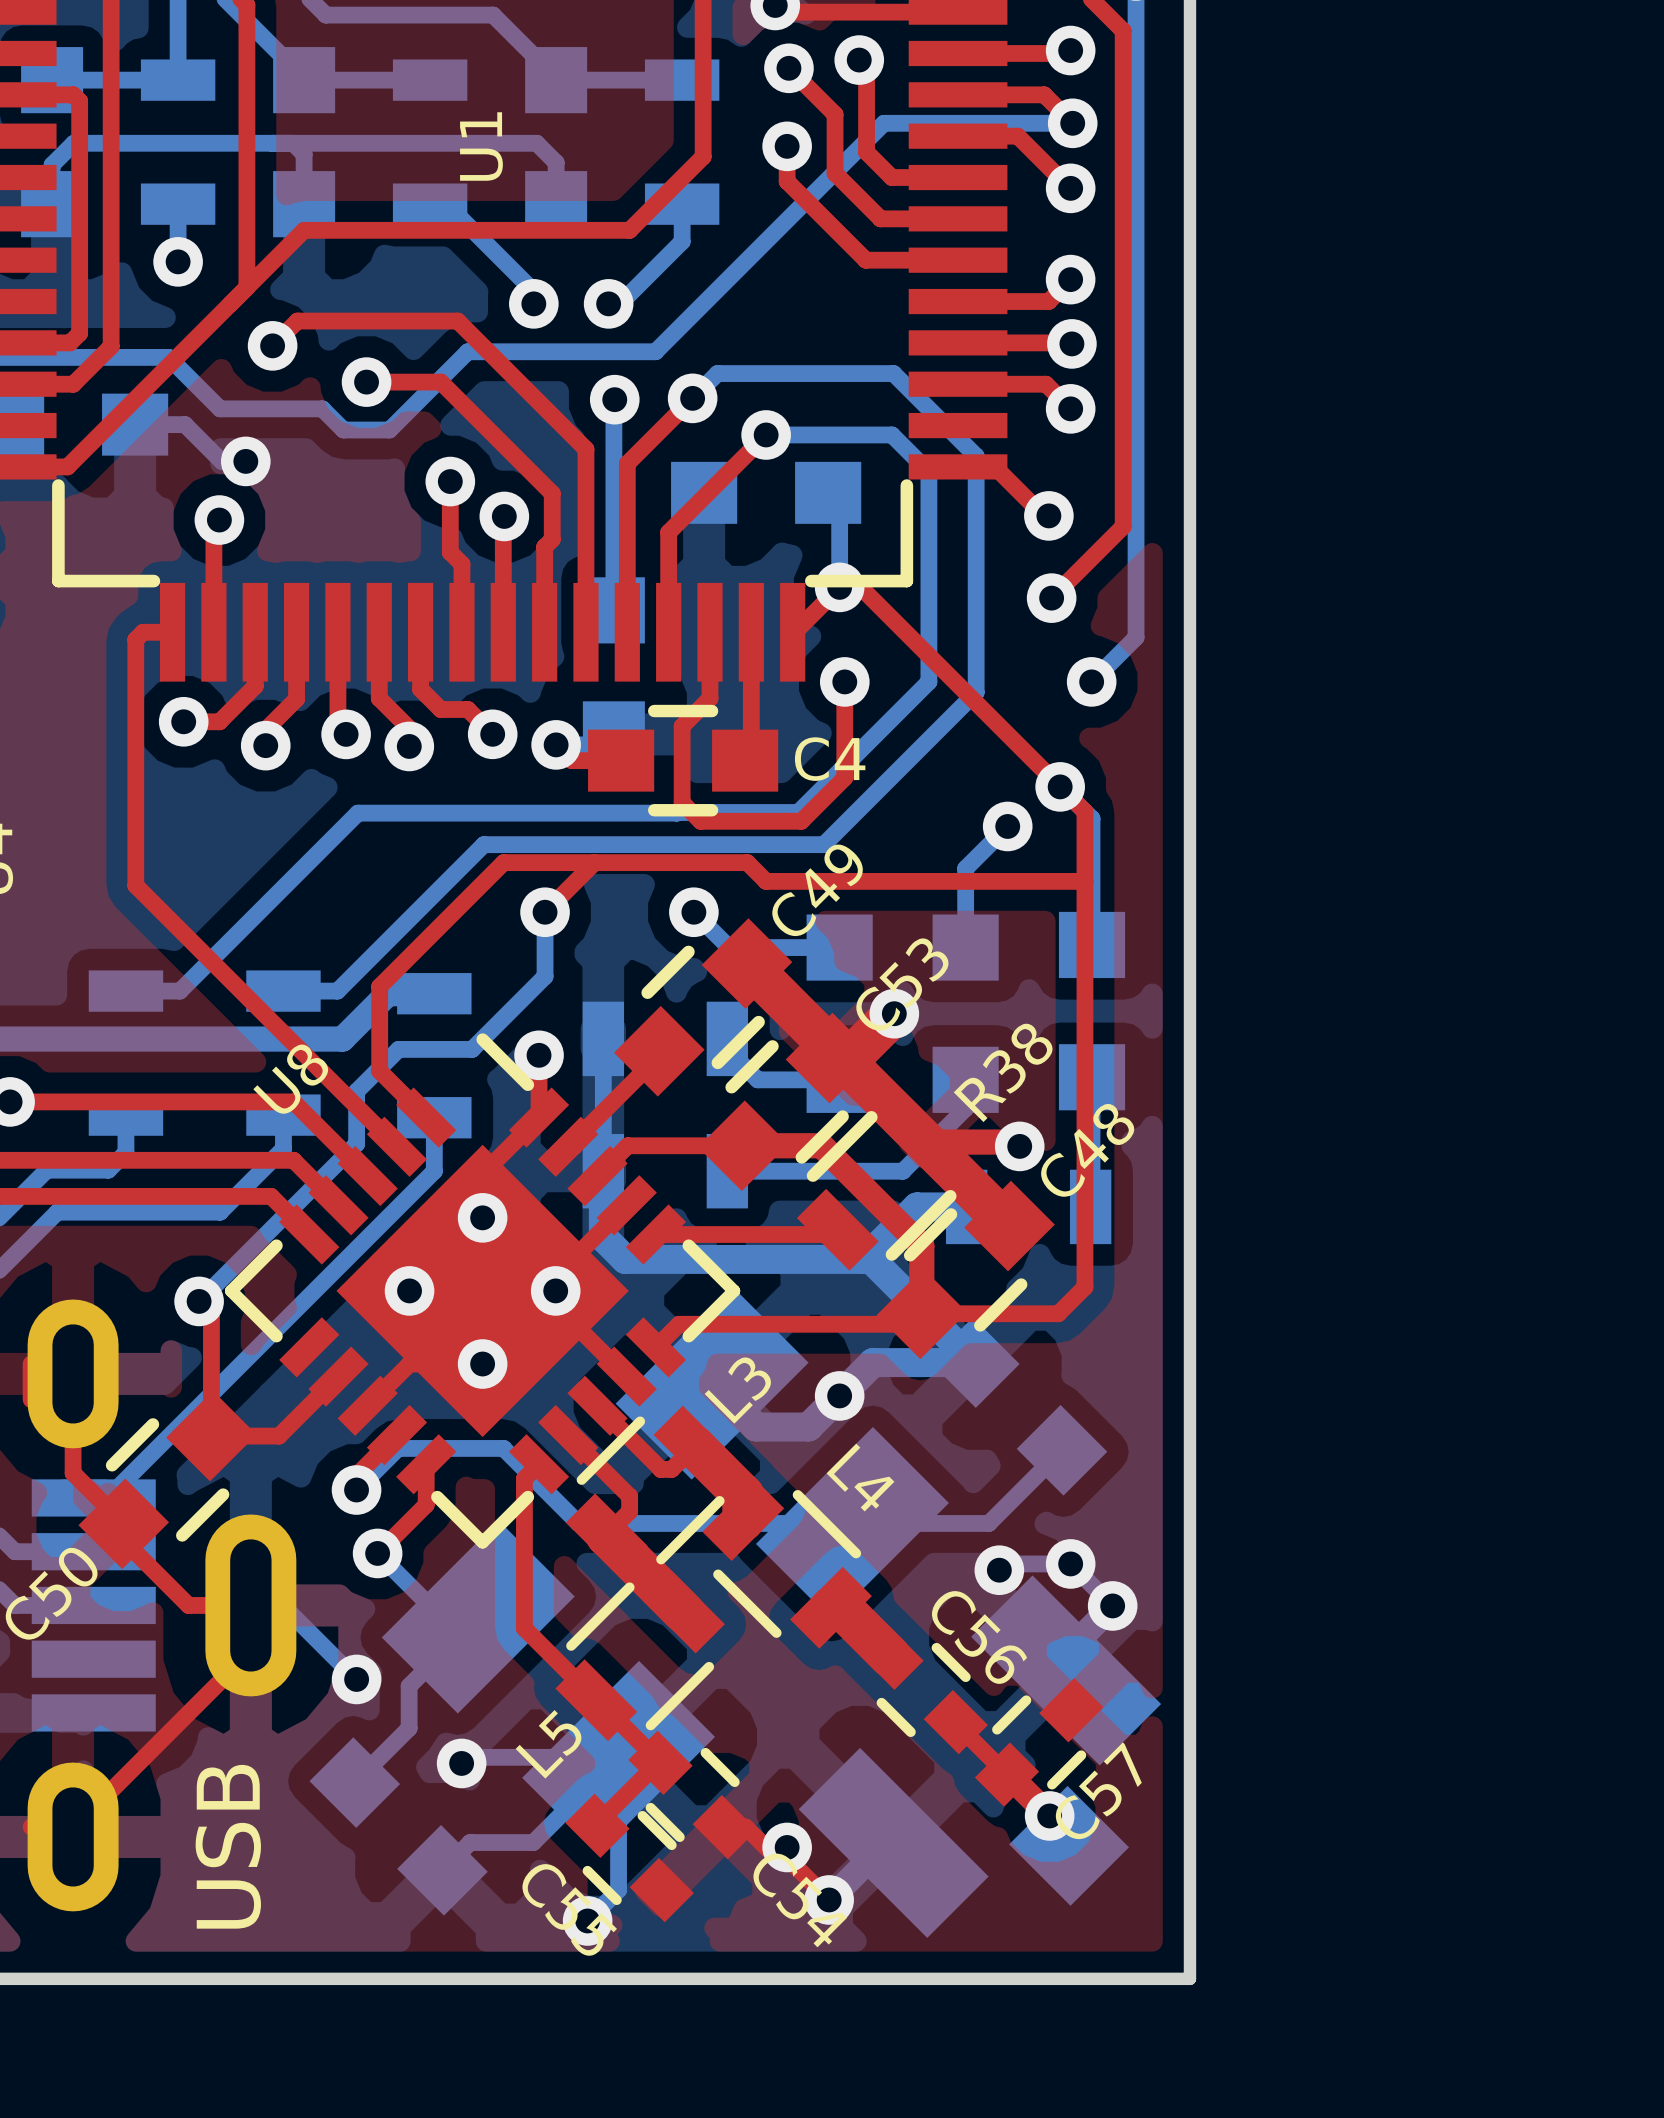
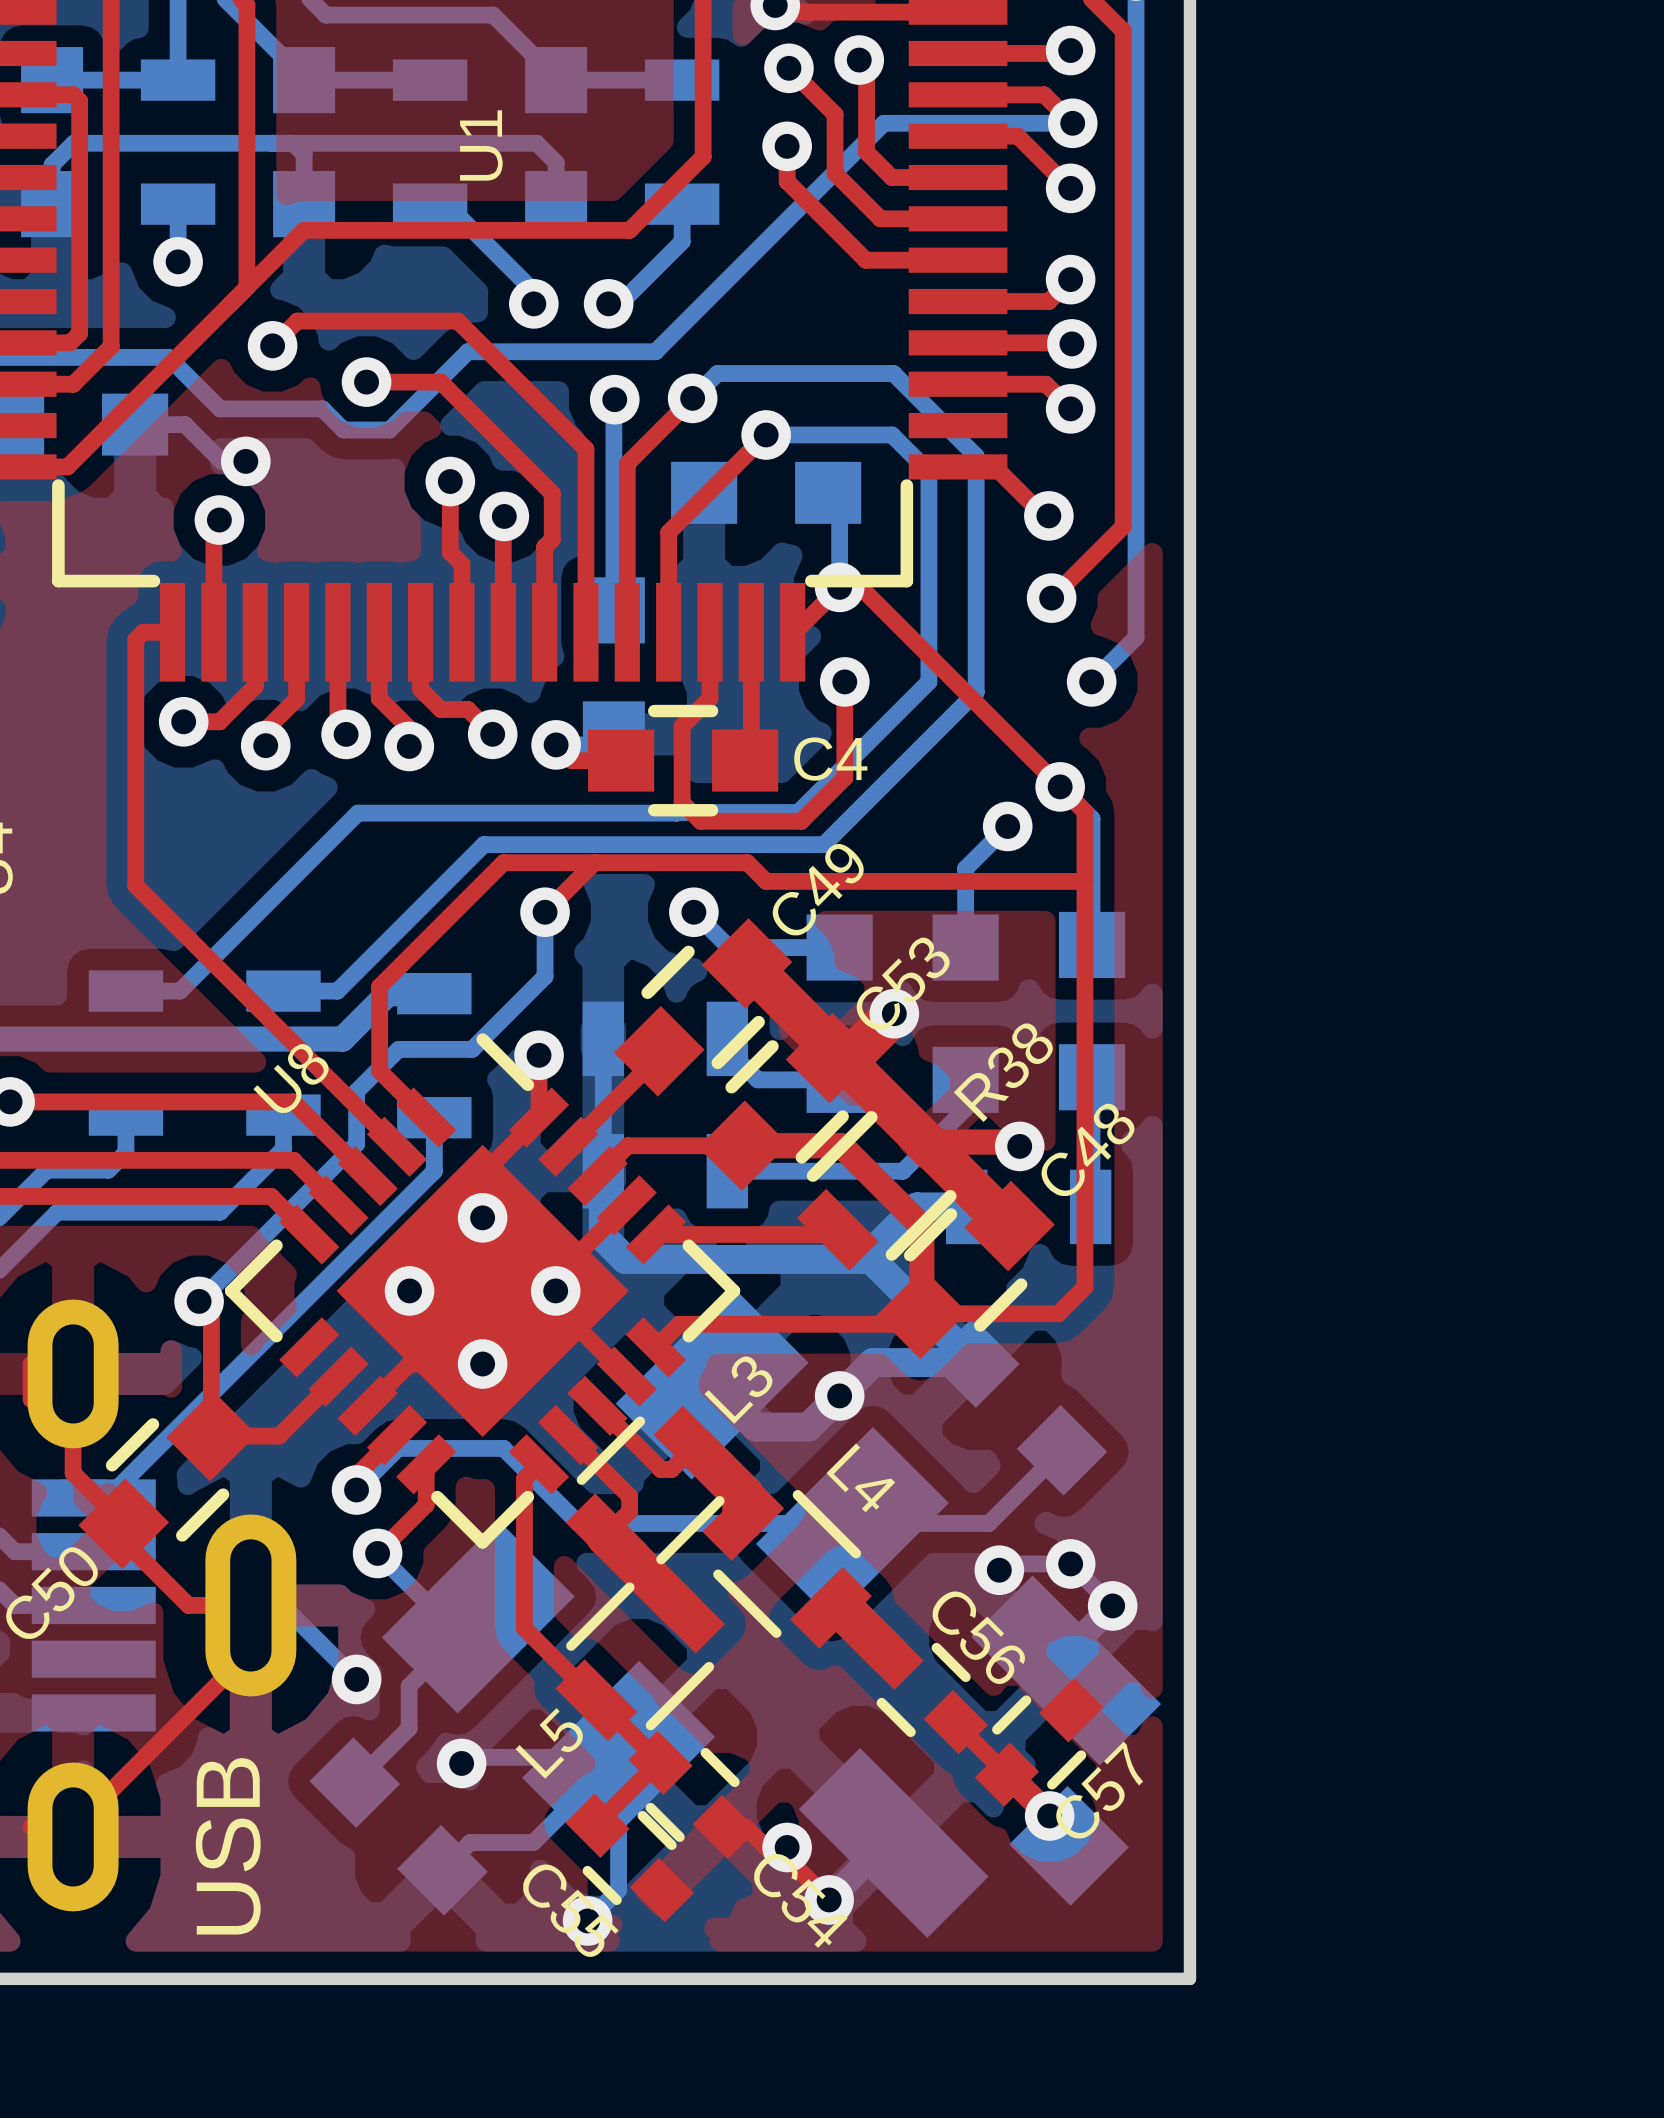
top track: (821, 1145) (921, 1245) -> (821, 1145) (841, 1145) (921, 1226) (921, 1245)

